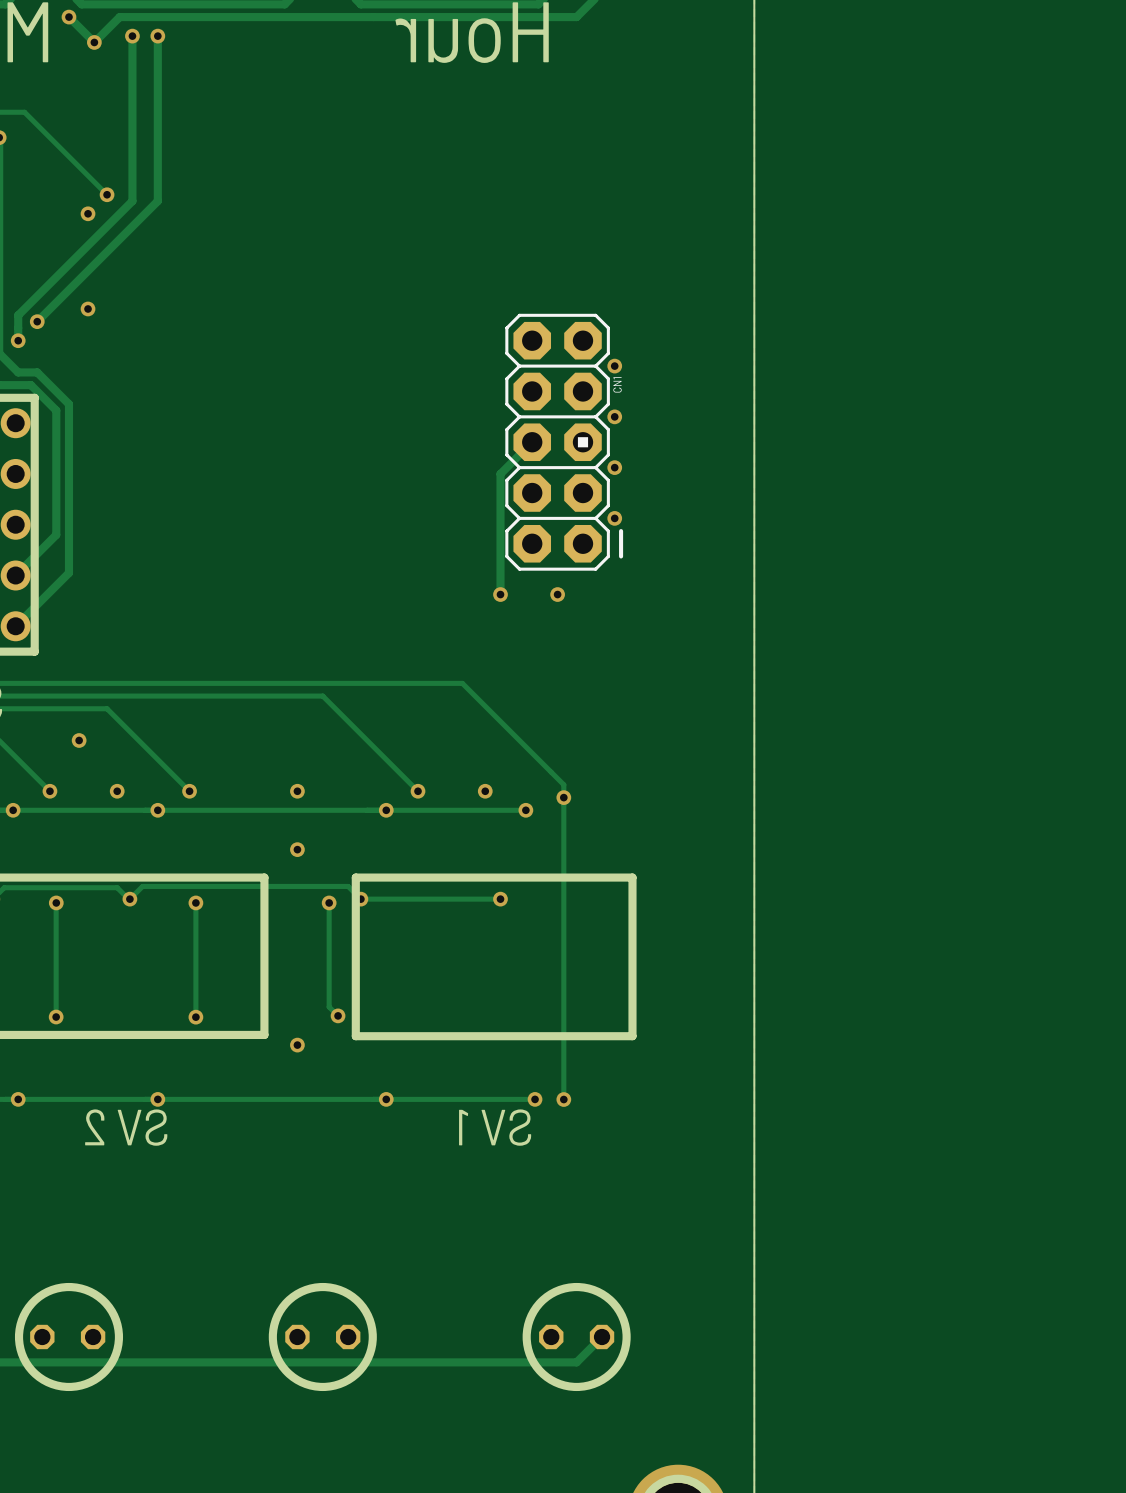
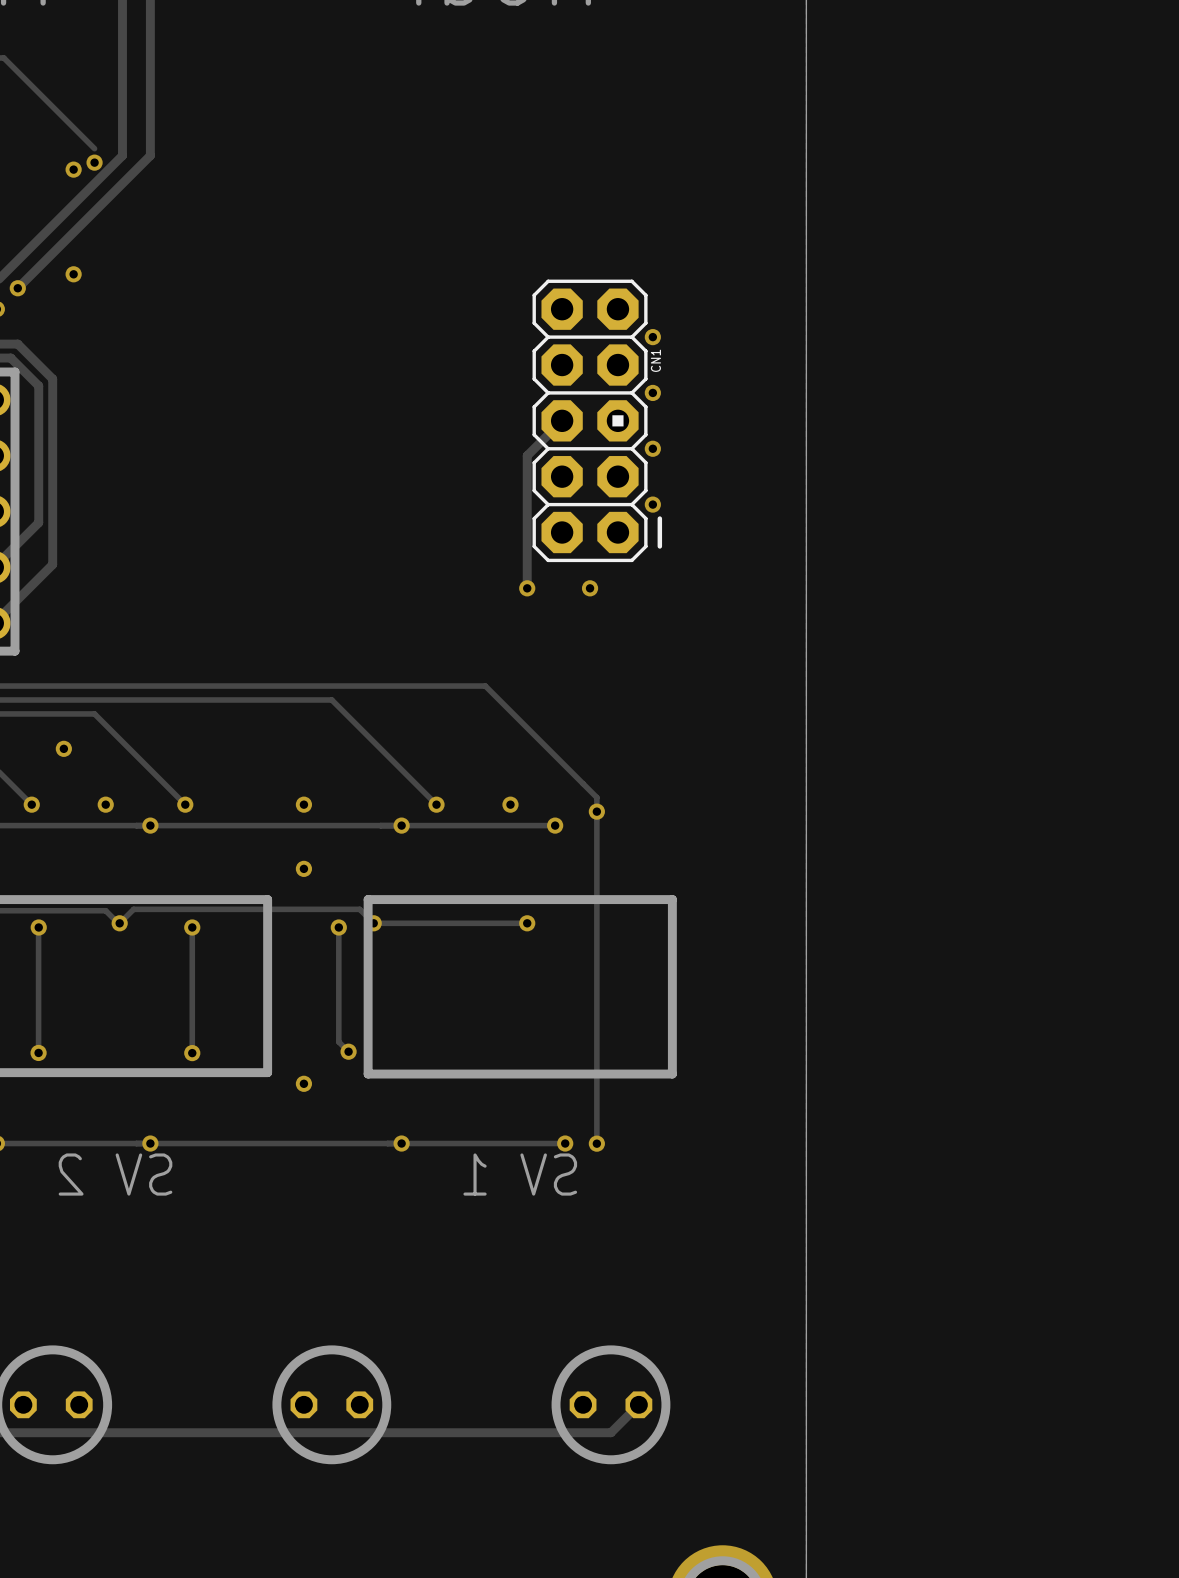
via position: (107, 194) -> (94, 162)

